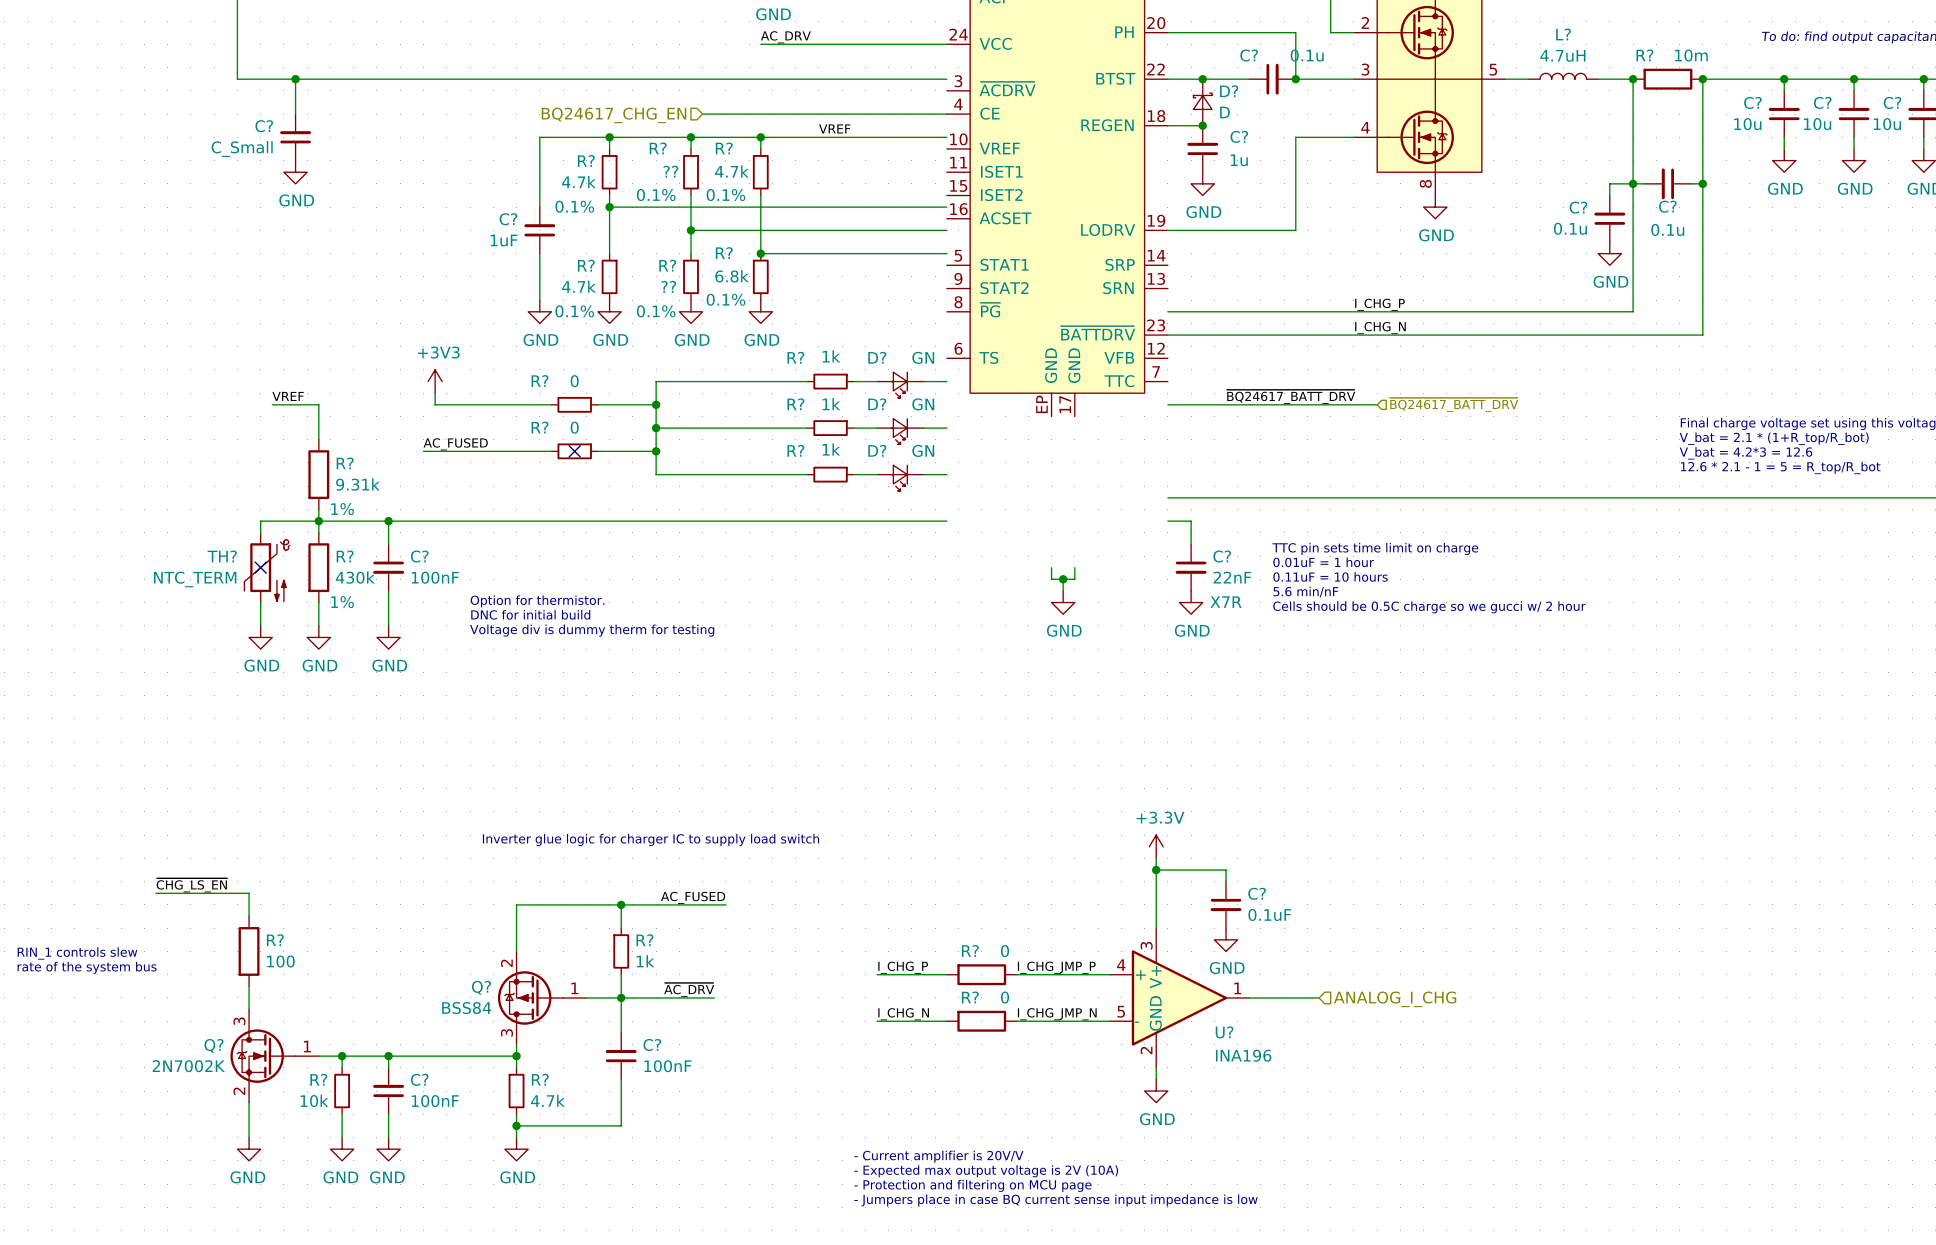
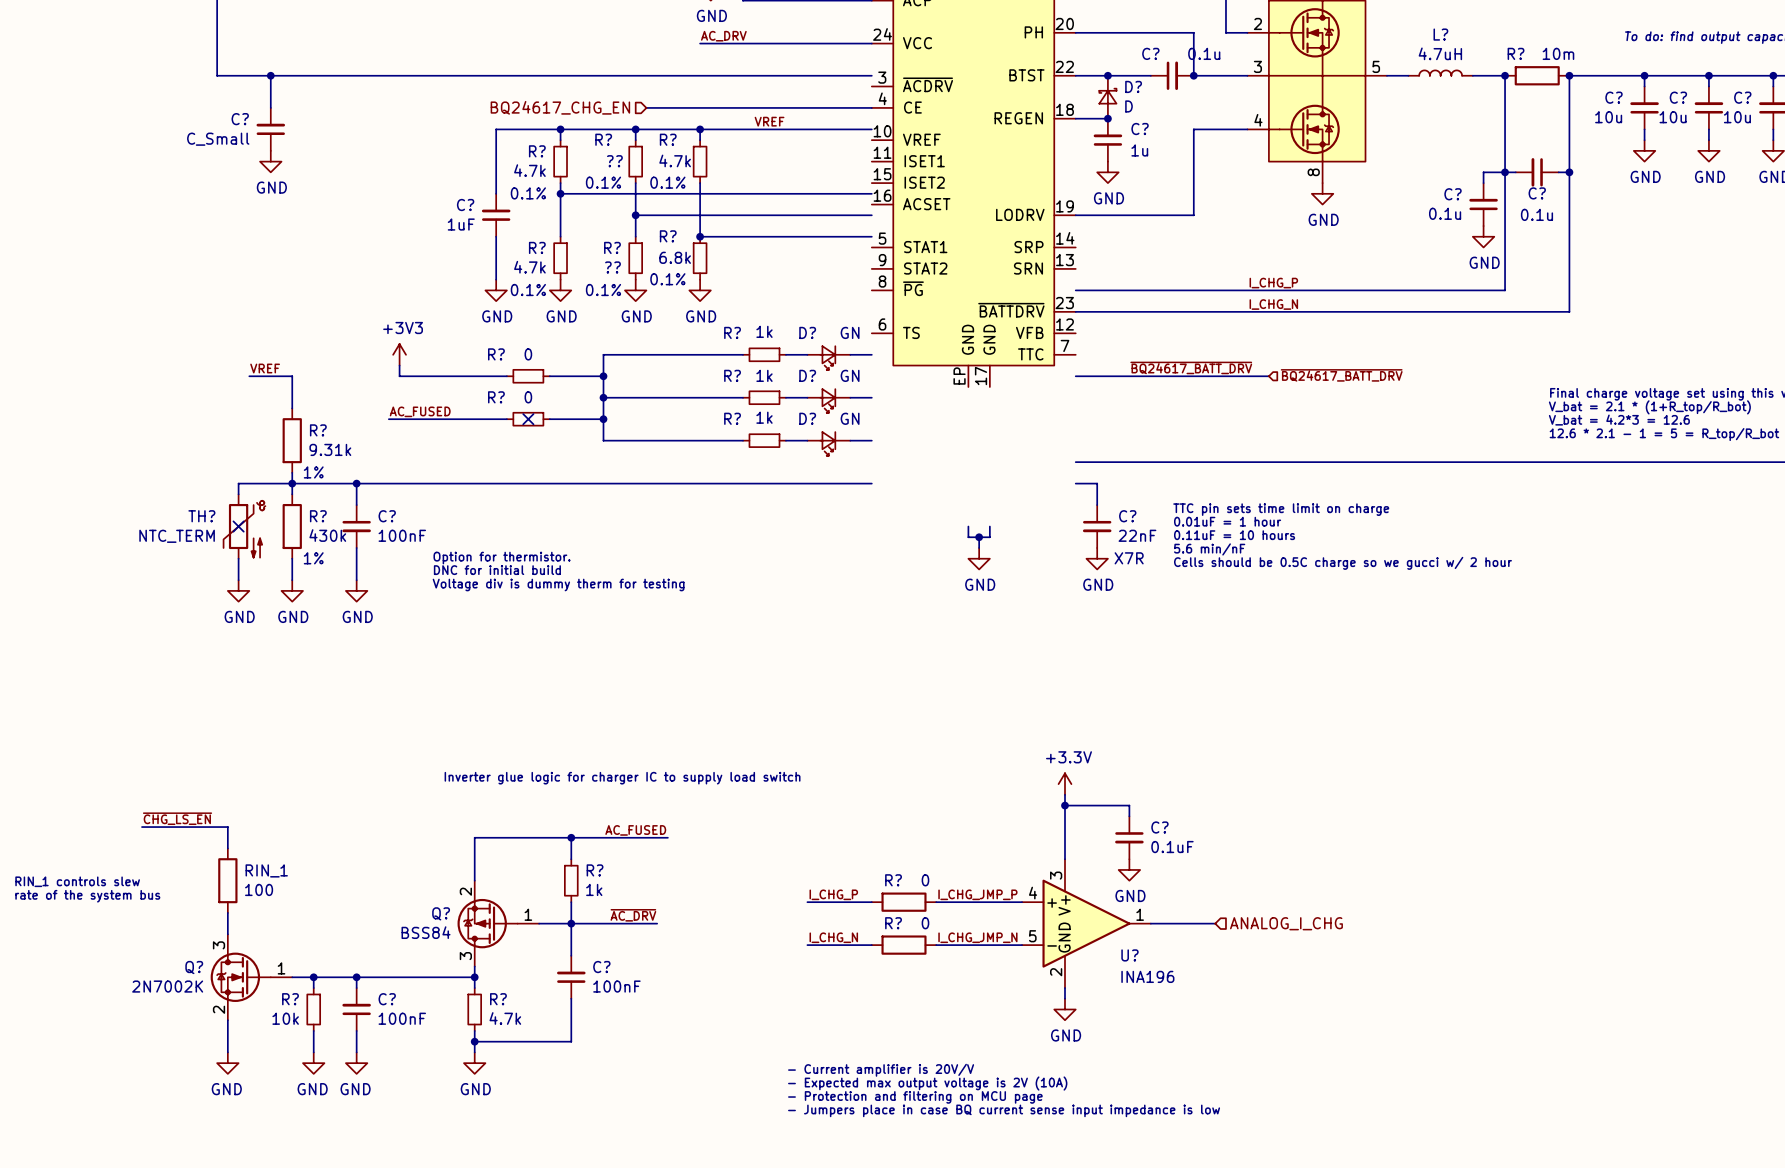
R? name: R? (275, 940) -> RIN_1 (266, 870)

